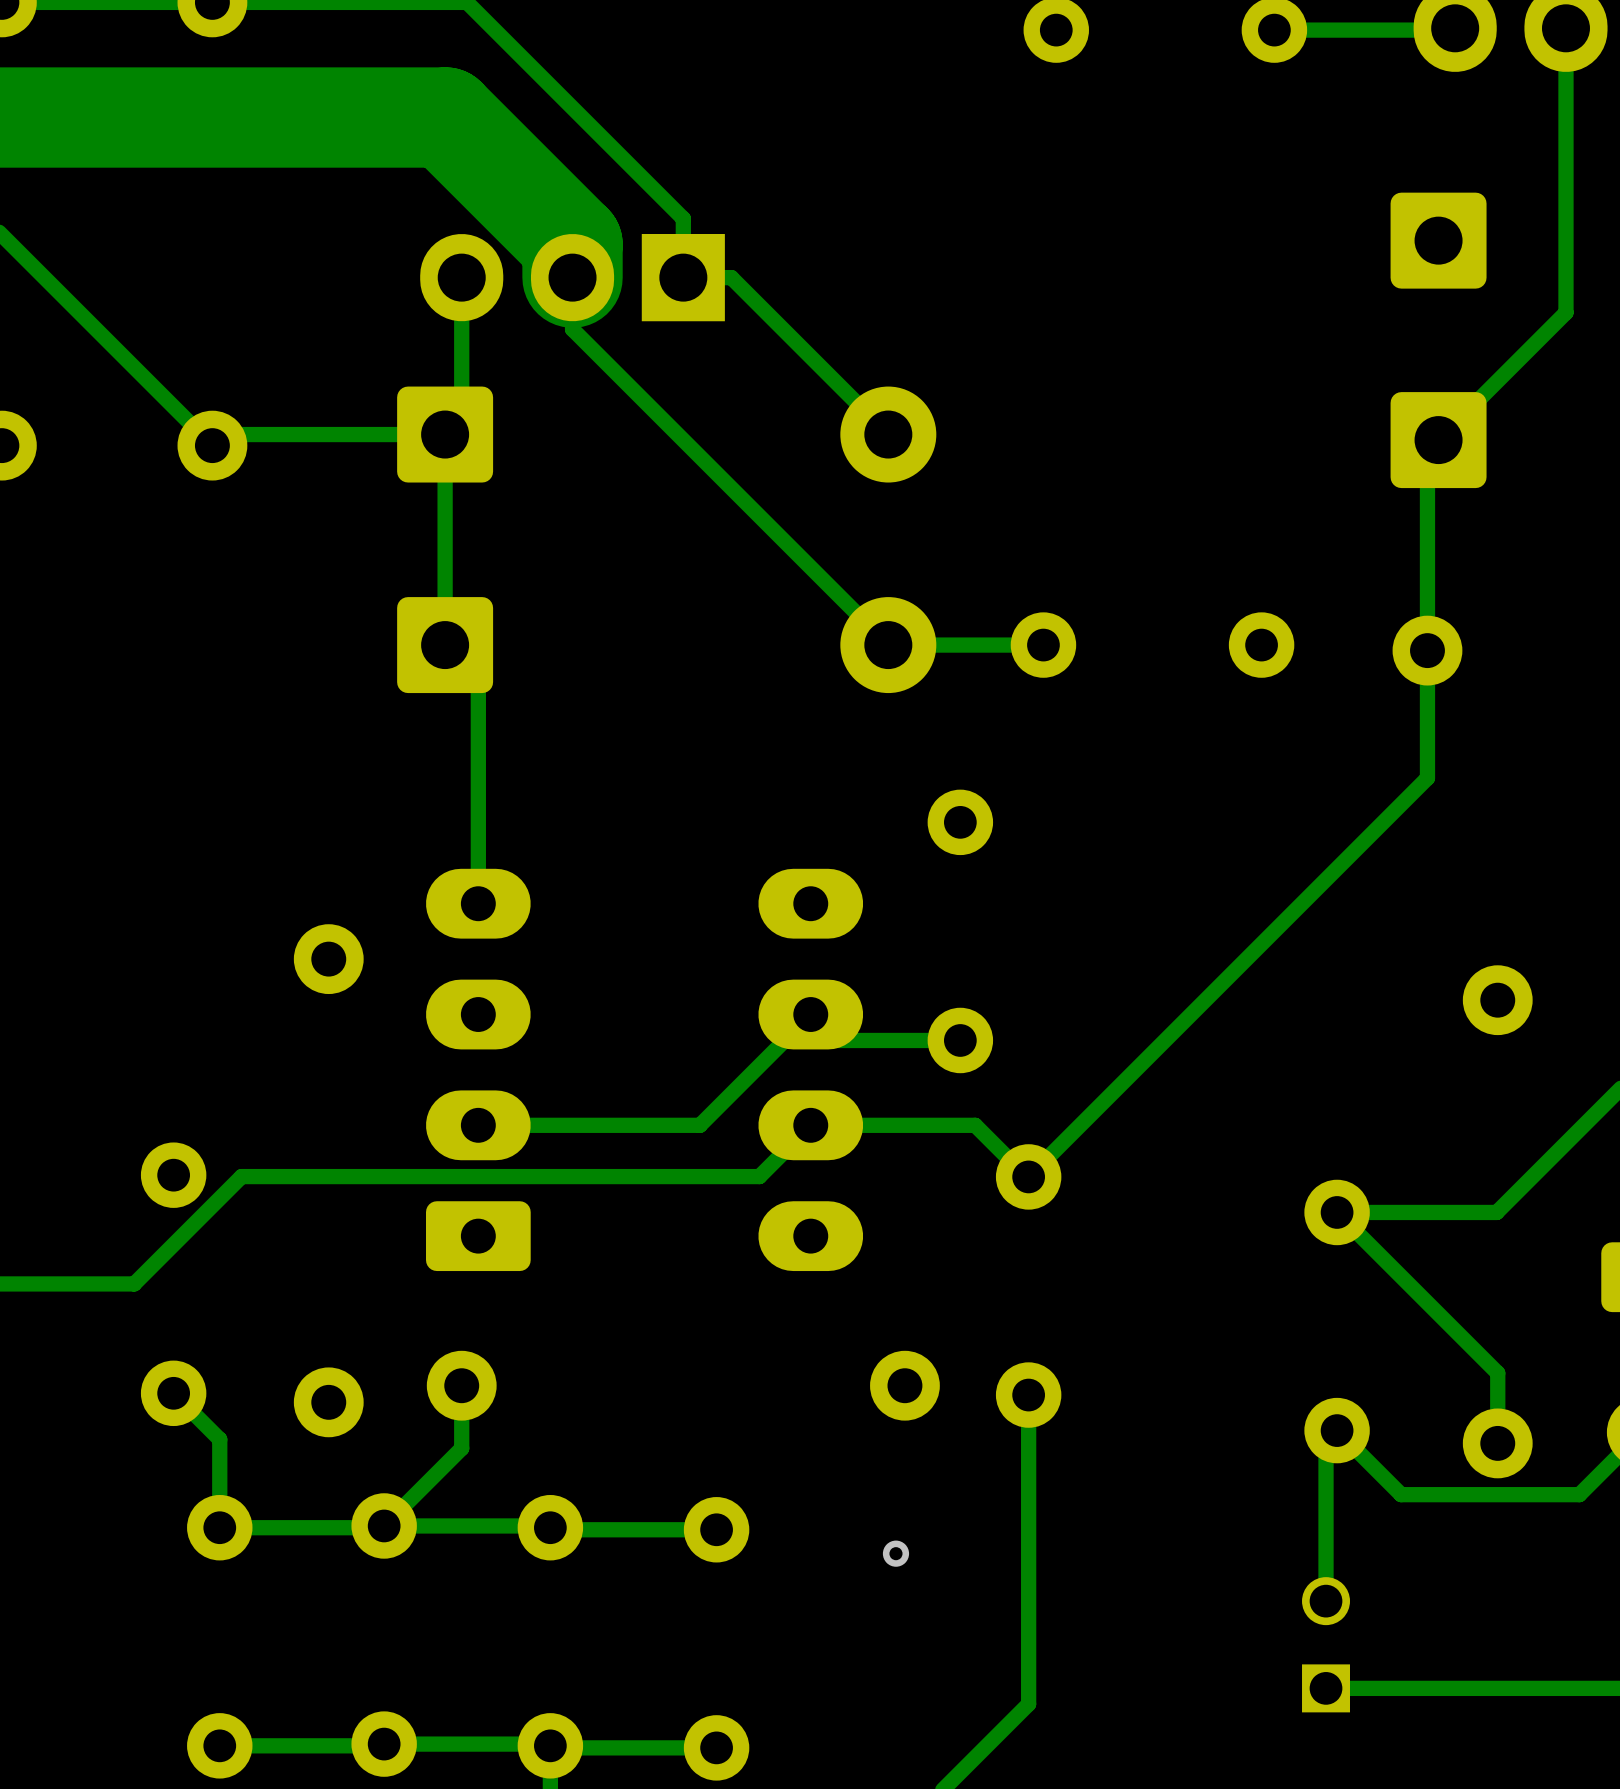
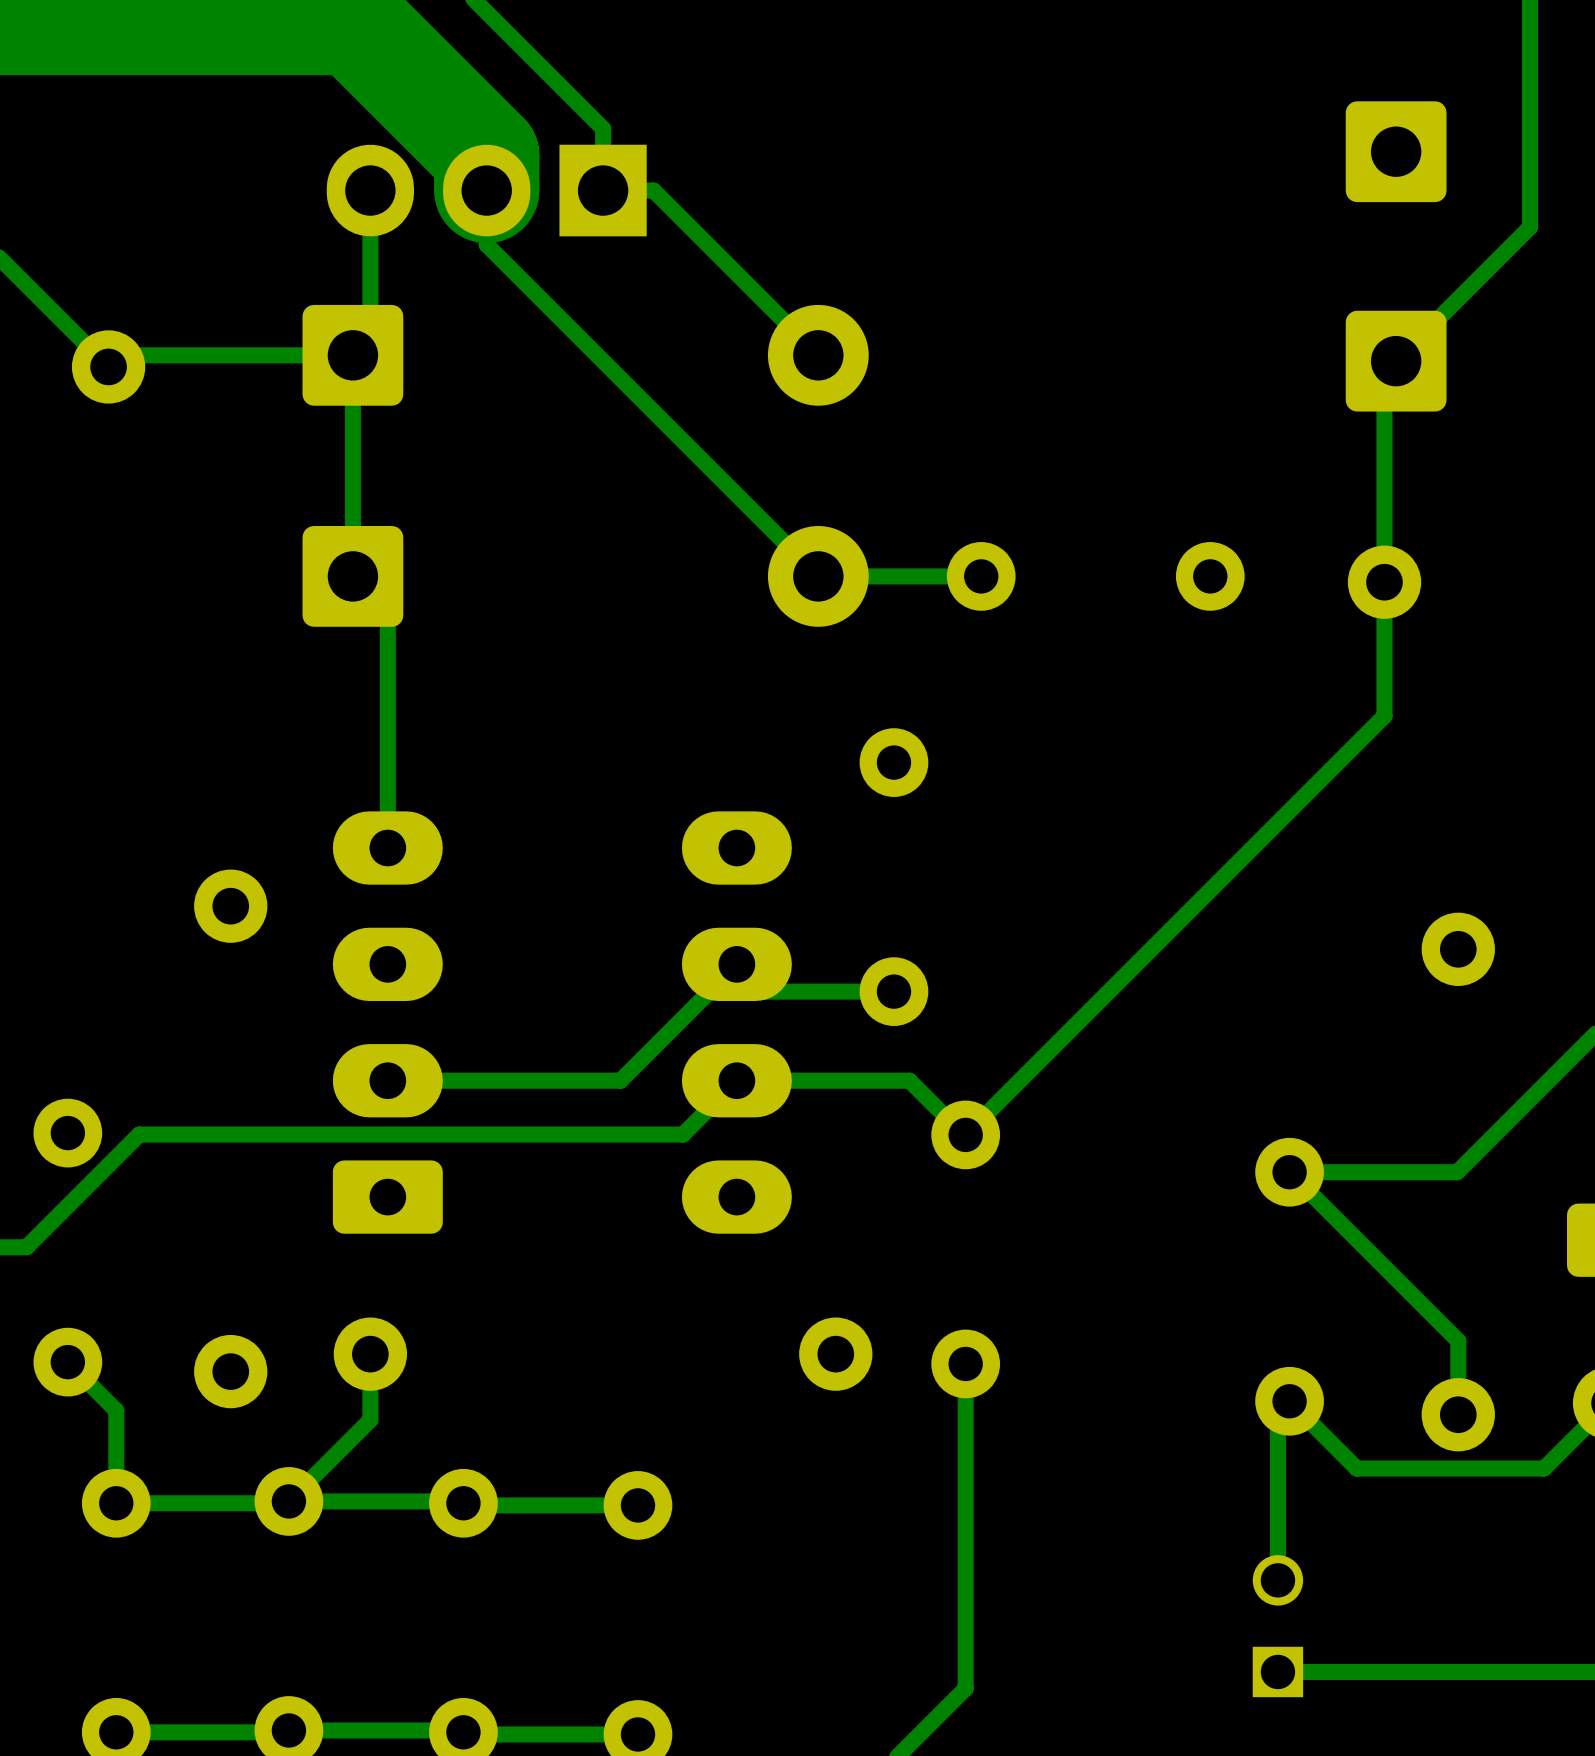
via: (895, 1553) -> none

